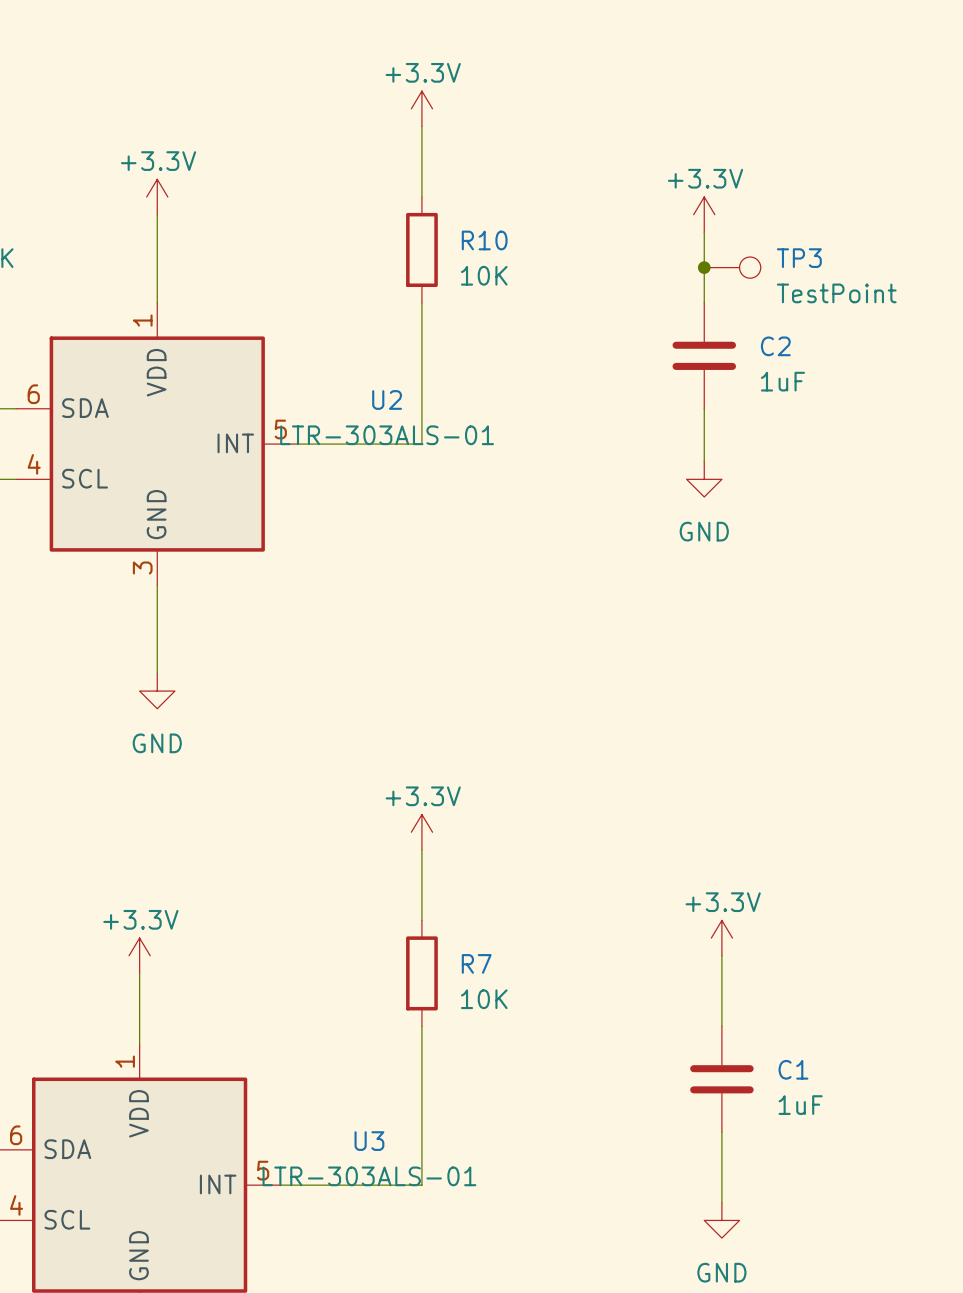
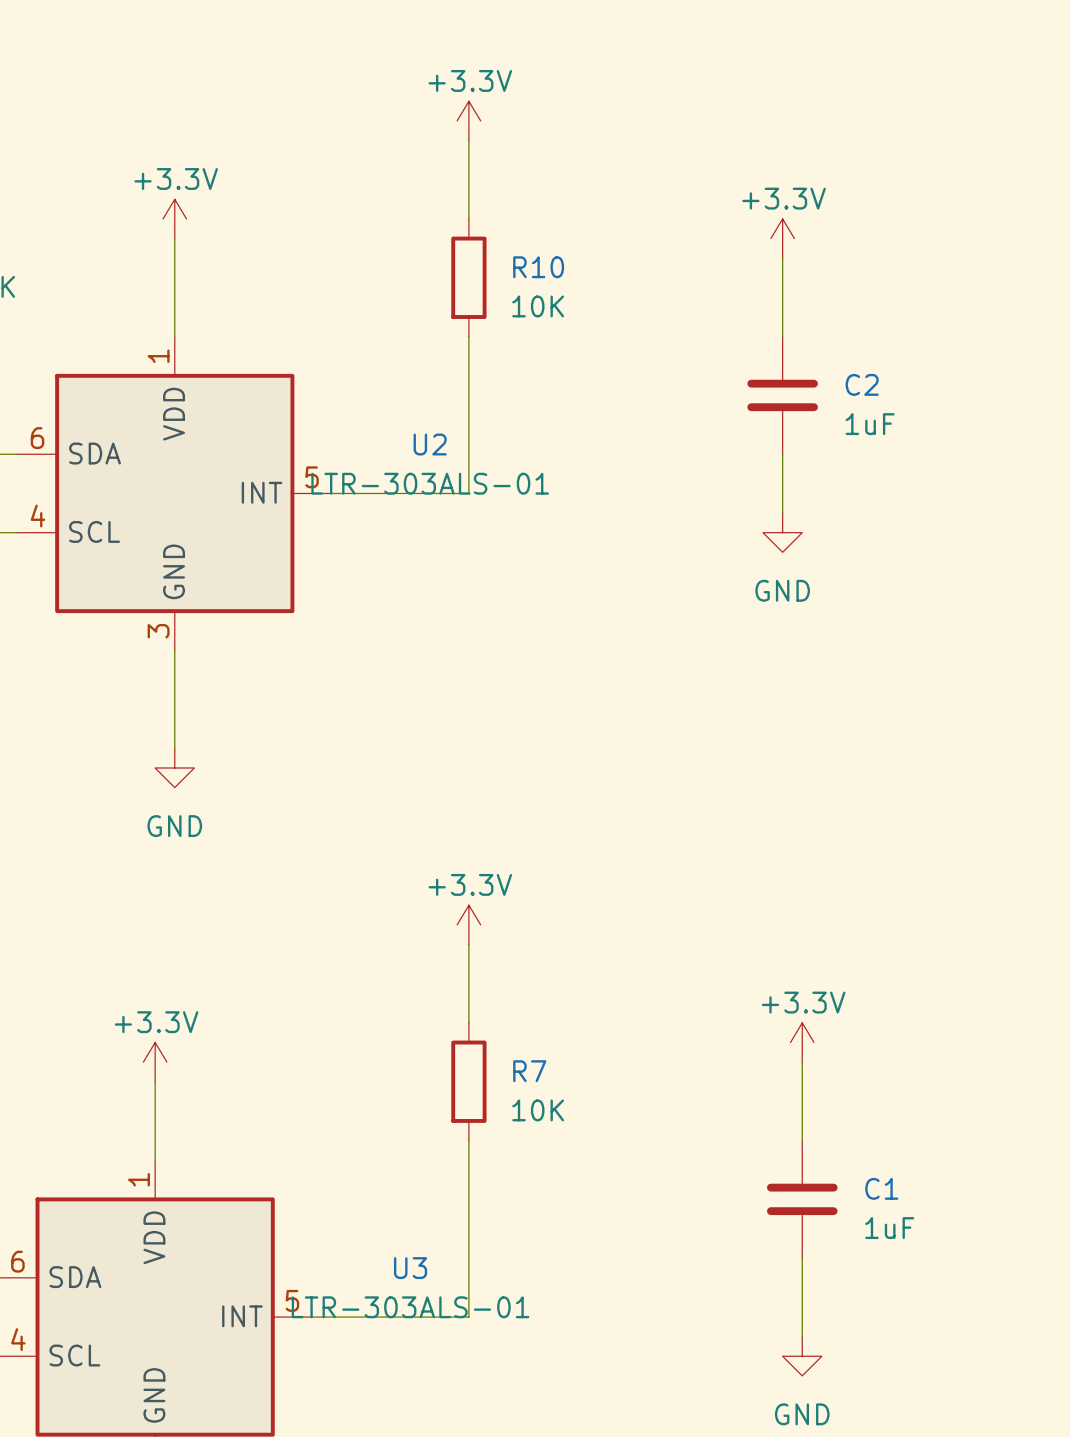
junction: (704, 267) -> none
TP3: TestPoint (732, 267) -> none

